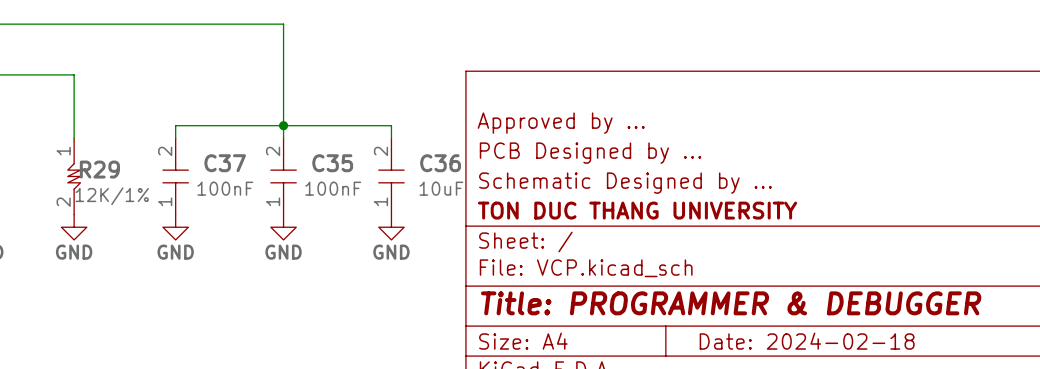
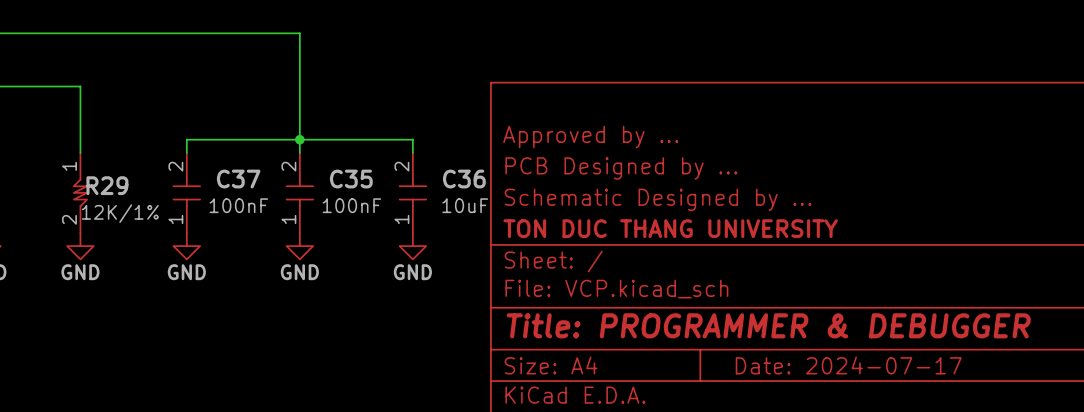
title block: Date: 2024-02-18 (807, 341) -> Date: 2024-07-17 (848, 365)

